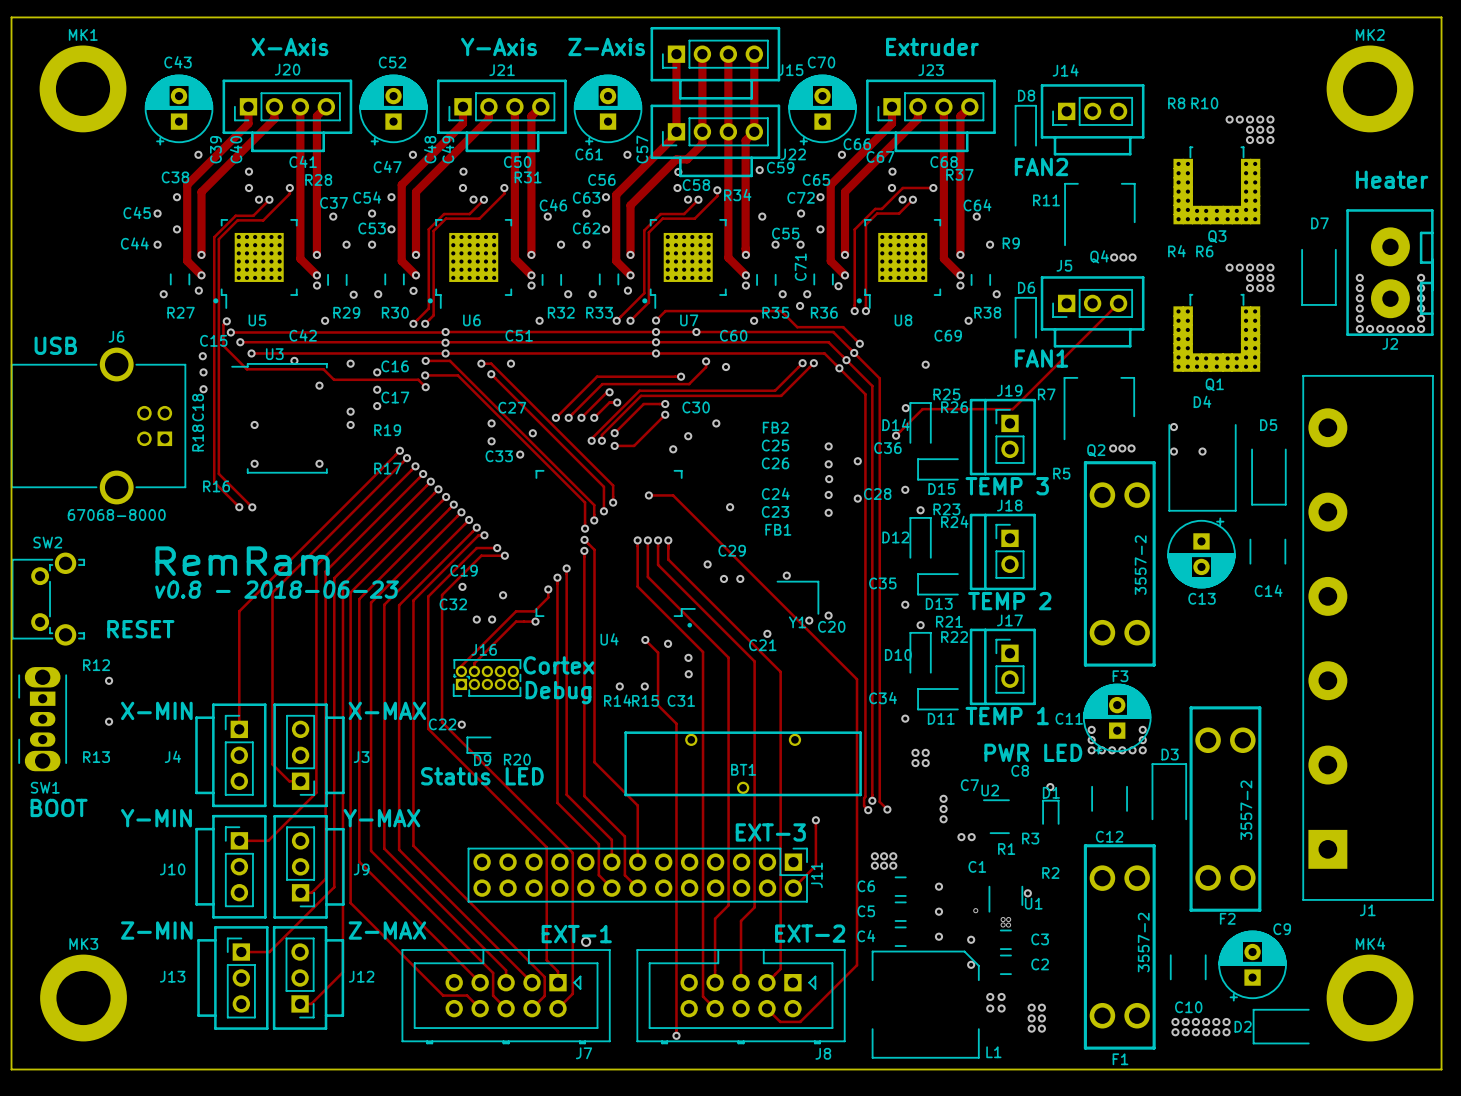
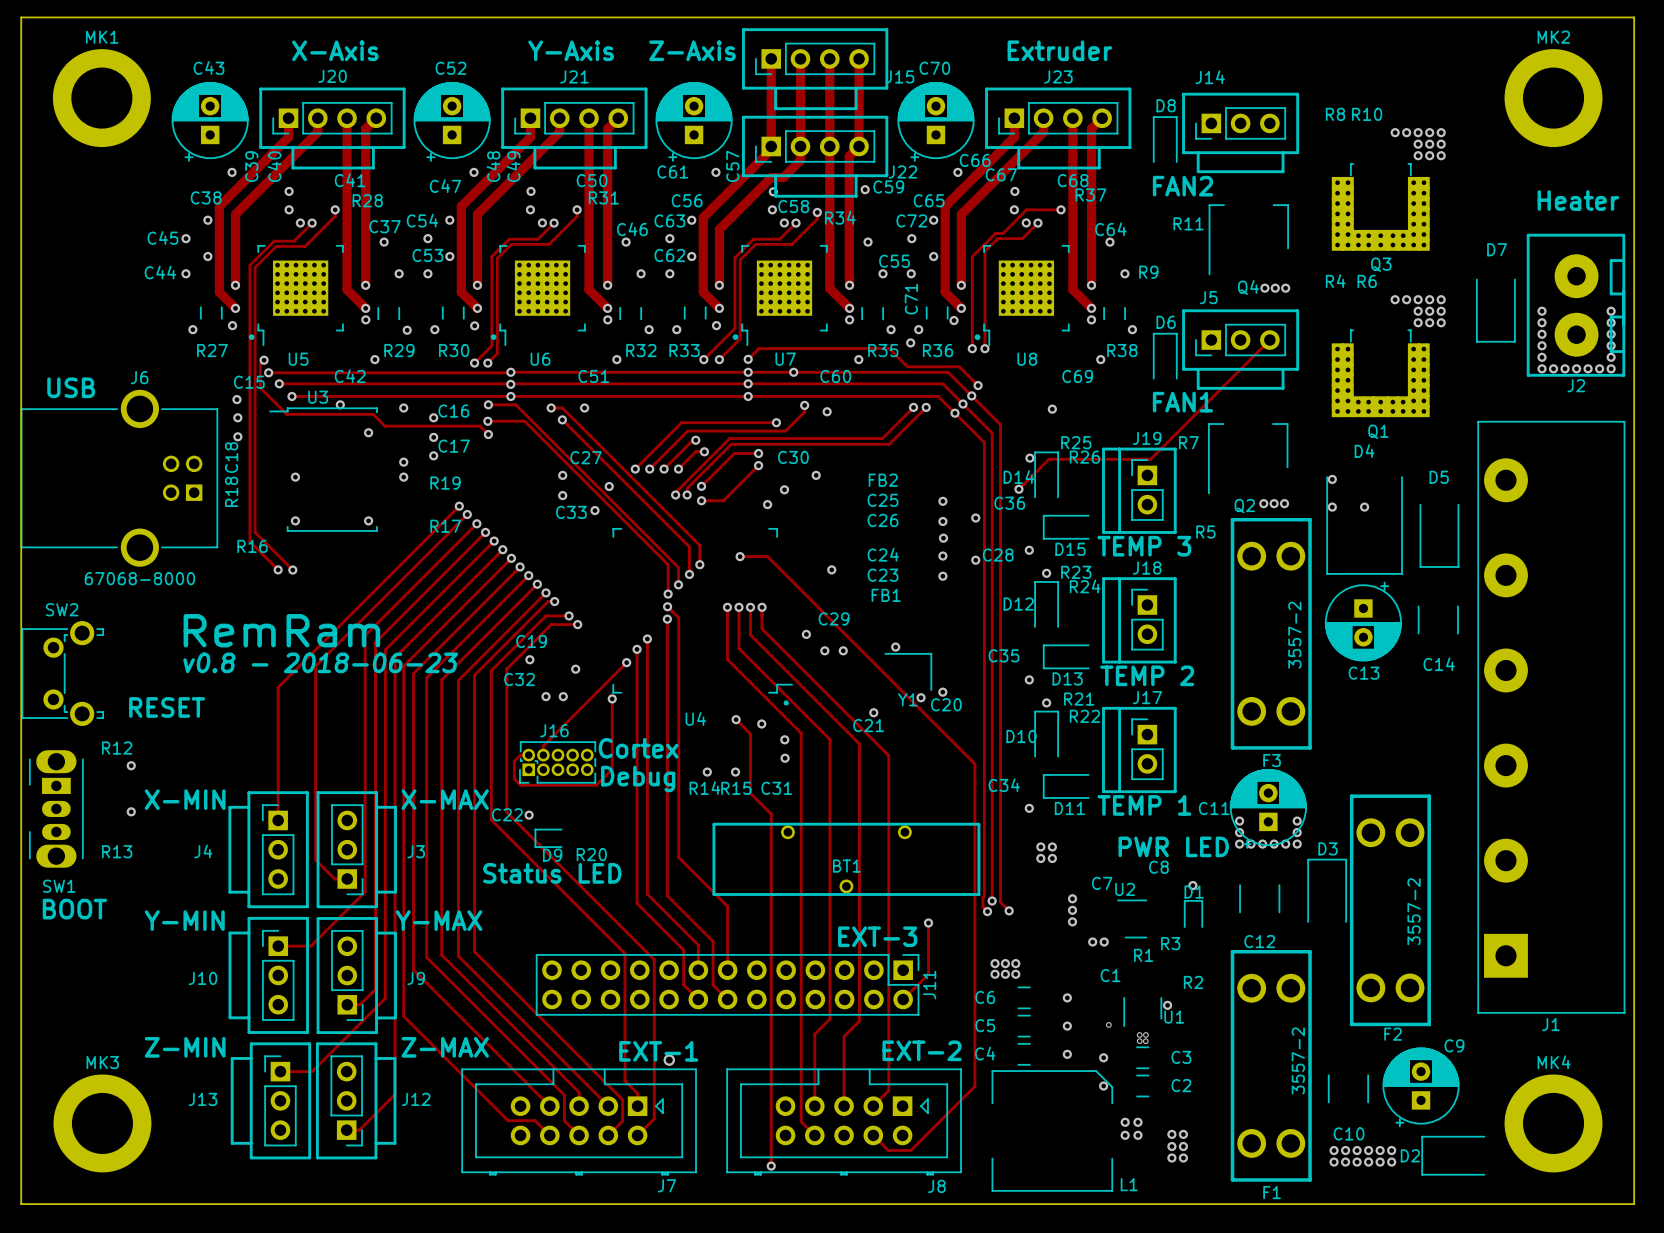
track: (548, 589) (548, 597) (534, 611) (516, 611) (460, 666) (461, 671) -> (612, 698) (612, 769) (596, 785) (520, 785) (514, 778) (514, 761) (520, 755) (528, 755)
track: (516, 621) (535, 621) -> (590, 698) (626, 662)

